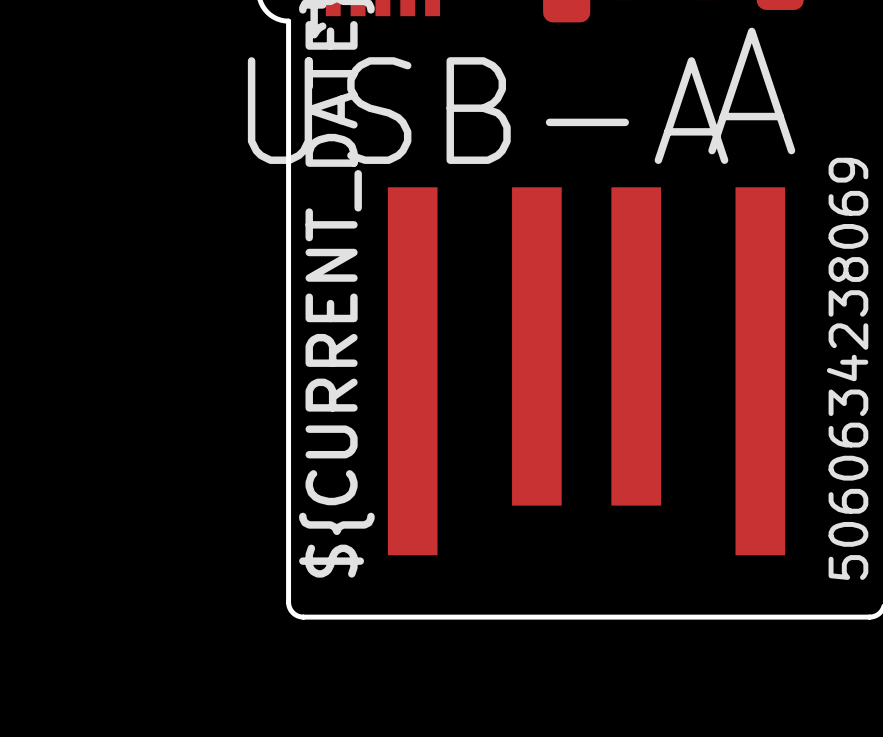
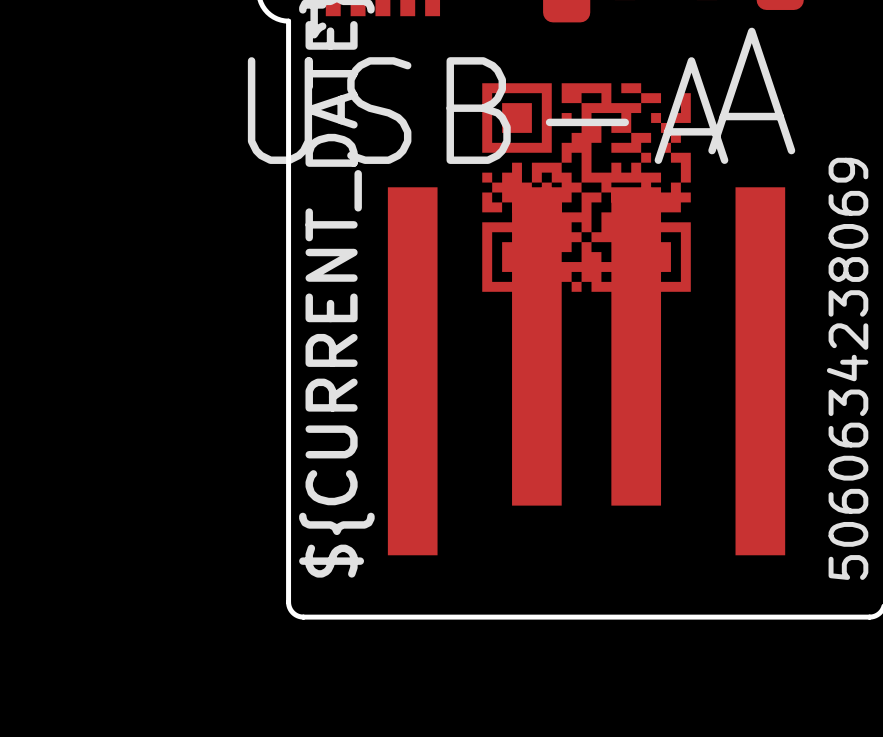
part: none -> (586, 187)

